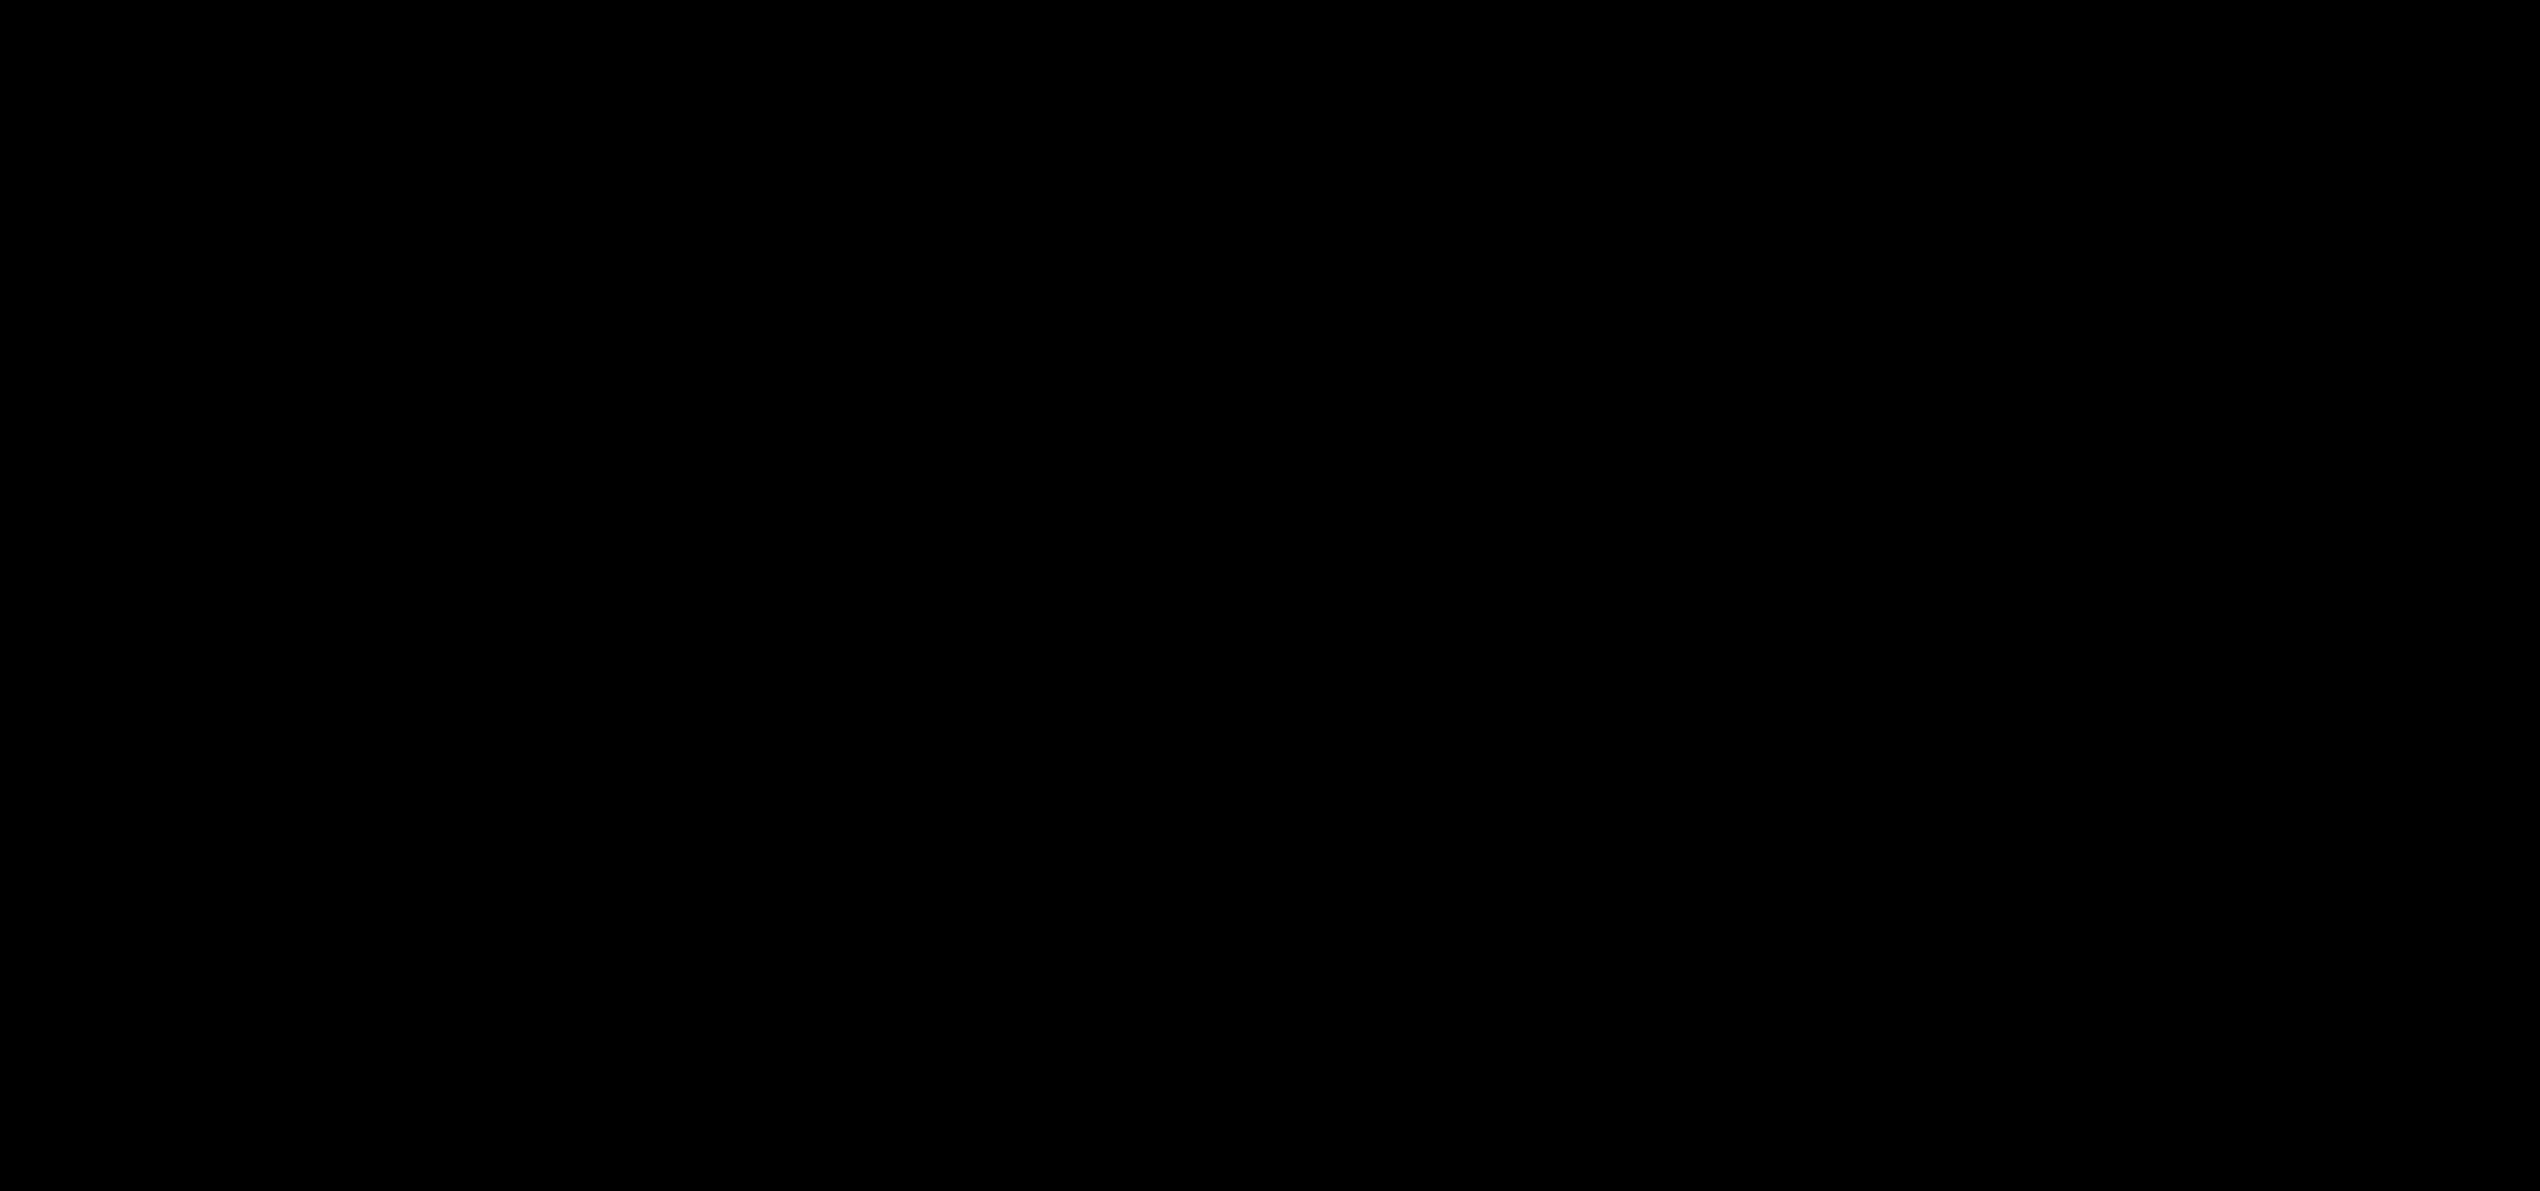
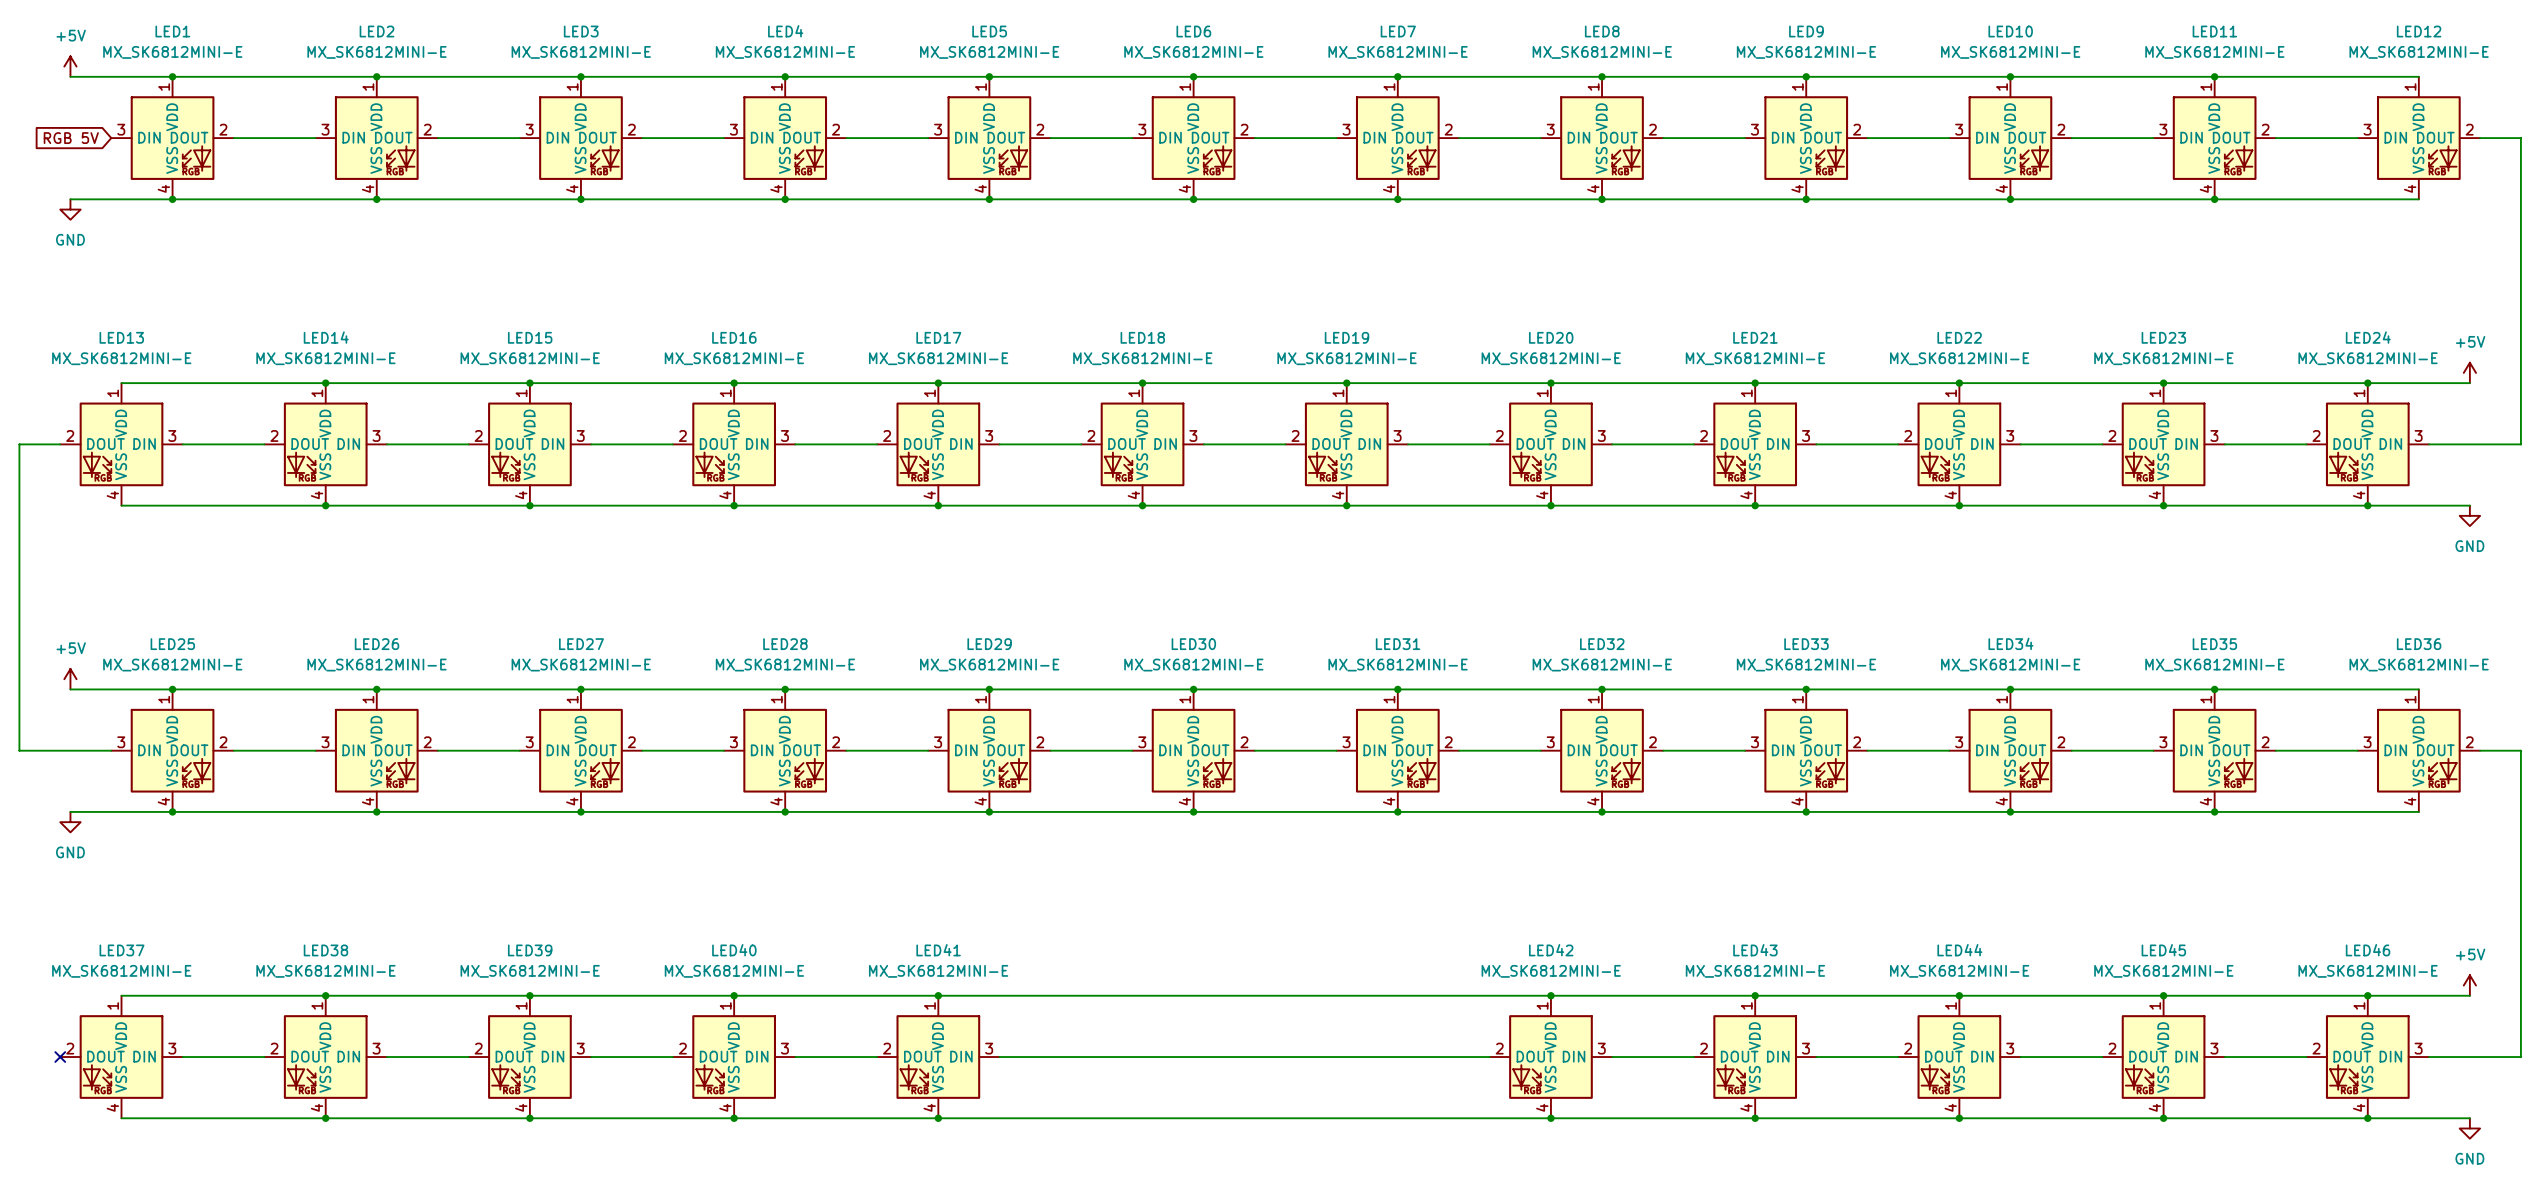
power symbol: none -> +5V (70, 66)
wire: none -> (70, 76) (2418, 76)
junction: none -> (172, 76)
junction: none -> (376, 76)
junction: none -> (580, 76)
junction: none -> (785, 76)
junction: none -> (989, 76)
junction: none -> (1193, 76)
junction: none -> (1397, 76)
junction: none -> (1602, 76)
junction: none -> (1806, 76)
junction: none -> (2010, 76)
junction: none -> (2214, 76)
global label: none -> RGB 5V (71, 138)
LED1: none -> MX_SK6812MINI-E (172, 138)
wire: none -> (233, 138) (315, 138)
LED2: none -> MX_SK6812MINI-E (376, 138)
wire: none -> (438, 138) (519, 138)
LED3: none -> MX_SK6812MINI-E (580, 138)
wire: none -> (642, 138) (723, 138)
LED4: none -> MX_SK6812MINI-E (785, 138)
wire: none -> (846, 138) (928, 138)
LED5: none -> MX_SK6812MINI-E (989, 138)
wire: none -> (1050, 138) (1132, 138)
LED6: none -> MX_SK6812MINI-E (1193, 138)
wire: none -> (1254, 138) (1336, 138)
LED7: none -> MX_SK6812MINI-E (1397, 138)
wire: none -> (1459, 138) (1540, 138)
LED8: none -> MX_SK6812MINI-E (1602, 138)
wire: none -> (1663, 138) (1744, 138)
LED9: none -> MX_SK6812MINI-E (1806, 138)
wire: none -> (1867, 138) (1949, 138)
LED10: none -> MX_SK6812MINI-E (2010, 138)
wire: none -> (2071, 138) (2153, 138)
LED11: none -> MX_SK6812MINI-E (2214, 138)
wire: none -> (2275, 138) (2357, 138)
LED12: none -> MX_SK6812MINI-E (2418, 138)
wire: none -> (2480, 138) (2520, 138) (2520, 444) (2429, 444)
wire: none -> (70, 199) (2418, 199)
junction: none -> (172, 199)
junction: none -> (376, 199)
junction: none -> (580, 199)
junction: none -> (785, 199)
junction: none -> (989, 199)
junction: none -> (1193, 199)
junction: none -> (1397, 199)
junction: none -> (1602, 199)
junction: none -> (1806, 199)
junction: none -> (2010, 199)
junction: none -> (2214, 199)
power symbol: none -> GND (70, 209)
power symbol: none -> +5V (2469, 372)
wire: none -> (121, 383) (2469, 383)
junction: none -> (325, 383)
junction: none -> (529, 383)
junction: none -> (734, 383)
junction: none -> (938, 383)
junction: none -> (1142, 383)
junction: none -> (1346, 383)
junction: none -> (1550, 383)
junction: none -> (1755, 383)
junction: none -> (1959, 383)
junction: none -> (2163, 383)
junction: none -> (2367, 383)
wire: none -> (60, 444) (19, 444) (19, 750) (111, 750)
LED13: none -> MX_SK6812MINI-E (121, 444)
wire: none -> (182, 444) (264, 444)
LED14: none -> MX_SK6812MINI-E (325, 444)
wire: none -> (386, 444) (468, 444)
LED15: none -> MX_SK6812MINI-E (529, 444)
wire: none -> (591, 444) (672, 444)
LED16: none -> MX_SK6812MINI-E (734, 444)
wire: none -> (795, 444) (877, 444)
LED17: none -> MX_SK6812MINI-E (938, 444)
wire: none -> (999, 444) (1081, 444)
LED18: none -> MX_SK6812MINI-E (1142, 444)
wire: none -> (1203, 444) (1285, 444)
LED19: none -> MX_SK6812MINI-E (1346, 444)
wire: none -> (1408, 444) (1489, 444)
LED20: none -> MX_SK6812MINI-E (1550, 444)
wire: none -> (1612, 444) (1693, 444)
LED21: none -> MX_SK6812MINI-E (1755, 444)
wire: none -> (1816, 444) (1898, 444)
LED22: none -> MX_SK6812MINI-E (1959, 444)
wire: none -> (2020, 444) (2102, 444)
LED23: none -> MX_SK6812MINI-E (2163, 444)
wire: none -> (2224, 444) (2306, 444)
LED24: none -> MX_SK6812MINI-E (2367, 444)
wire: none -> (121, 505) (2469, 505)
junction: none -> (325, 505)
junction: none -> (529, 505)
junction: none -> (734, 505)
junction: none -> (938, 505)
junction: none -> (1142, 505)
junction: none -> (1346, 505)
junction: none -> (1550, 505)
junction: none -> (1755, 505)
junction: none -> (1959, 505)
junction: none -> (2163, 505)
junction: none -> (2367, 505)
power symbol: none -> GND (2469, 515)
power symbol: none -> +5V (70, 679)
wire: none -> (70, 689) (2418, 689)
junction: none -> (172, 689)
junction: none -> (376, 689)
junction: none -> (580, 689)
junction: none -> (785, 689)
junction: none -> (989, 689)
junction: none -> (1193, 689)
junction: none -> (1397, 689)
junction: none -> (1602, 689)
junction: none -> (1806, 689)
junction: none -> (2010, 689)
junction: none -> (2214, 689)
LED25: none -> MX_SK6812MINI-E (172, 750)
wire: none -> (233, 750) (315, 750)
LED26: none -> MX_SK6812MINI-E (376, 750)
wire: none -> (438, 750) (519, 750)
LED27: none -> MX_SK6812MINI-E (580, 750)
wire: none -> (642, 750) (723, 750)
LED28: none -> MX_SK6812MINI-E (785, 750)
wire: none -> (846, 750) (928, 750)
LED29: none -> MX_SK6812MINI-E (989, 750)
wire: none -> (1050, 750) (1132, 750)
LED30: none -> MX_SK6812MINI-E (1193, 750)
wire: none -> (1254, 750) (1336, 750)
LED31: none -> MX_SK6812MINI-E (1397, 750)
wire: none -> (1459, 750) (1540, 750)
LED32: none -> MX_SK6812MINI-E (1602, 750)
wire: none -> (1663, 750) (1744, 750)
LED33: none -> MX_SK6812MINI-E (1806, 750)
wire: none -> (1867, 750) (1949, 750)
LED34: none -> MX_SK6812MINI-E (2010, 750)
wire: none -> (2071, 750) (2153, 750)
LED35: none -> MX_SK6812MINI-E (2214, 750)
wire: none -> (2275, 750) (2357, 750)
LED36: none -> MX_SK6812MINI-E (2418, 750)
wire: none -> (2480, 750) (2520, 750) (2520, 1057) (2429, 1057)
wire: none -> (70, 811) (2418, 811)
junction: none -> (172, 811)
junction: none -> (376, 811)
junction: none -> (580, 811)
junction: none -> (785, 811)
junction: none -> (989, 811)
junction: none -> (1193, 811)
junction: none -> (1397, 811)
junction: none -> (1602, 811)
junction: none -> (1806, 811)
junction: none -> (2010, 811)
junction: none -> (2214, 811)
power symbol: none -> GND (70, 822)
power symbol: none -> +5V (2469, 985)
wire: none -> (121, 995) (2469, 995)
junction: none -> (325, 995)
junction: none -> (529, 995)
junction: none -> (734, 995)
junction: none -> (938, 995)
junction: none -> (1550, 995)
junction: none -> (1755, 995)
junction: none -> (1959, 995)
junction: none -> (2163, 995)
junction: none -> (2367, 995)
no-connect mark: none -> (60, 1057)
LED37: none -> MX_SK6812MINI-E (121, 1057)
wire: none -> (182, 1057) (264, 1057)
LED38: none -> MX_SK6812MINI-E (325, 1057)
wire: none -> (386, 1057) (468, 1057)
LED39: none -> MX_SK6812MINI-E (529, 1057)
wire: none -> (591, 1057) (672, 1057)
LED40: none -> MX_SK6812MINI-E (734, 1057)
wire: none -> (795, 1057) (877, 1057)
LED41: none -> MX_SK6812MINI-E (938, 1057)
wire: none -> (999, 1057) (1489, 1057)
LED42: none -> MX_SK6812MINI-E (1550, 1057)
wire: none -> (1612, 1057) (1693, 1057)
LED43: none -> MX_SK6812MINI-E (1755, 1057)
wire: none -> (1816, 1057) (1898, 1057)
LED44: none -> MX_SK6812MINI-E (1959, 1057)
wire: none -> (2020, 1057) (2102, 1057)
LED45: none -> MX_SK6812MINI-E (2163, 1057)
wire: none -> (2224, 1057) (2306, 1057)
LED46: none -> MX_SK6812MINI-E (2367, 1057)
wire: none -> (121, 1118) (2469, 1118)
junction: none -> (325, 1118)
junction: none -> (529, 1118)
junction: none -> (734, 1118)
junction: none -> (938, 1118)
junction: none -> (1550, 1118)
junction: none -> (1755, 1118)
junction: none -> (1959, 1118)
junction: none -> (2163, 1118)
junction: none -> (2367, 1118)
power symbol: none -> GND (2469, 1128)

